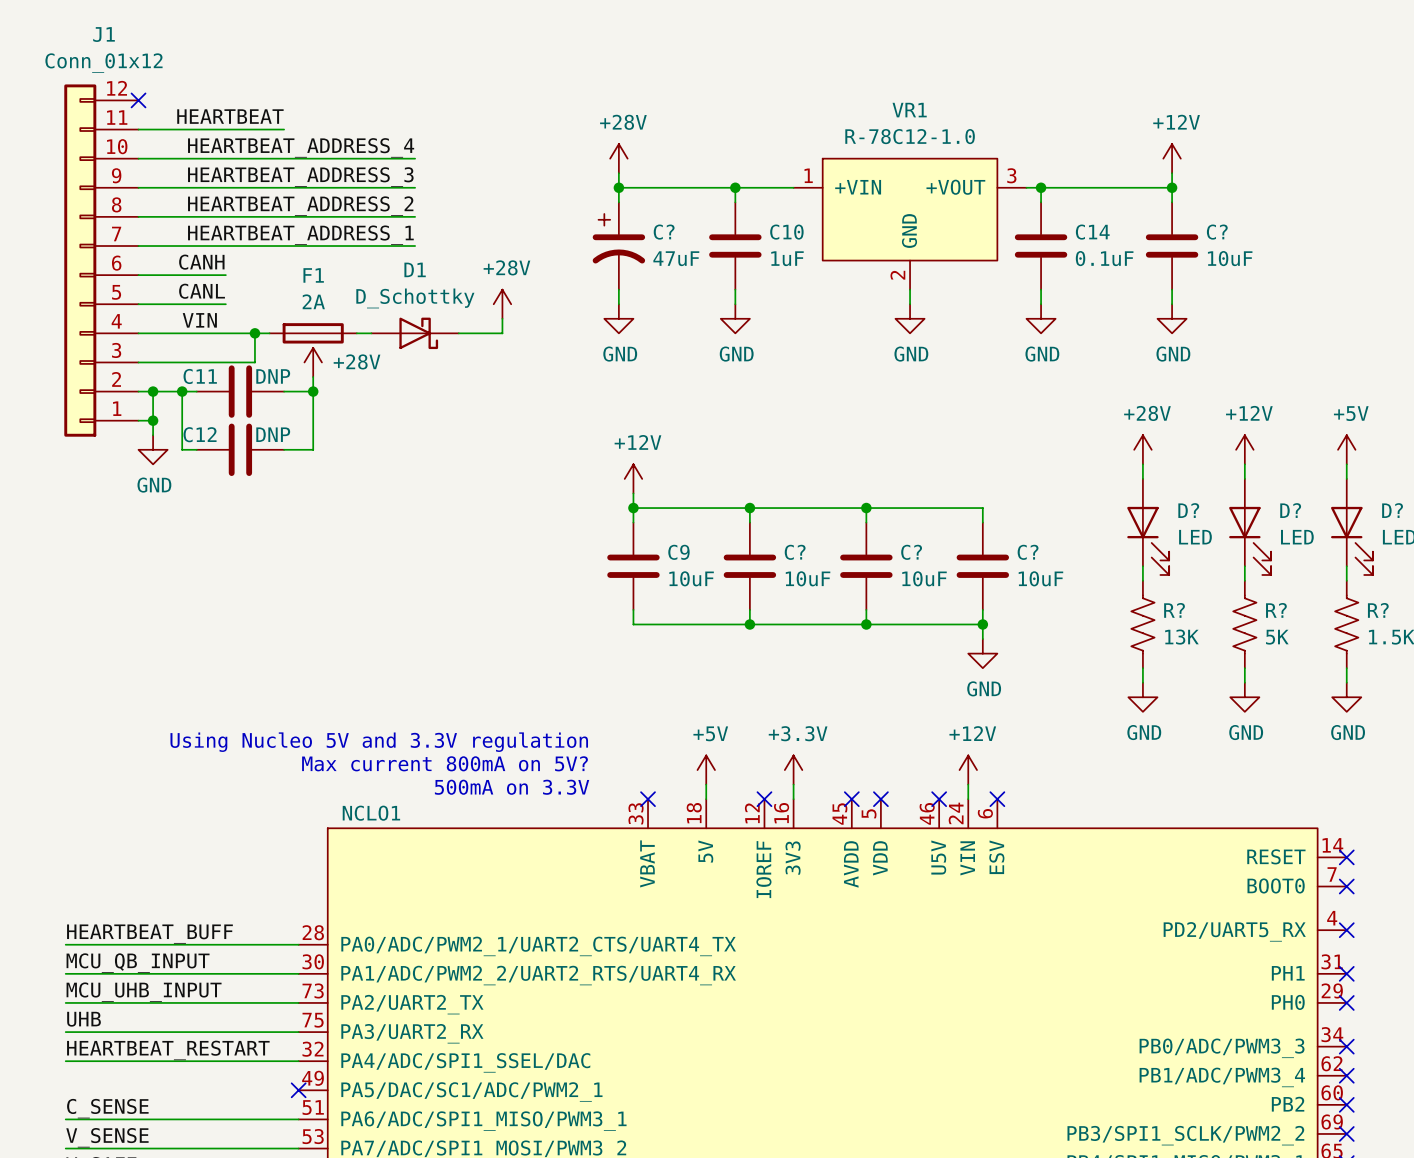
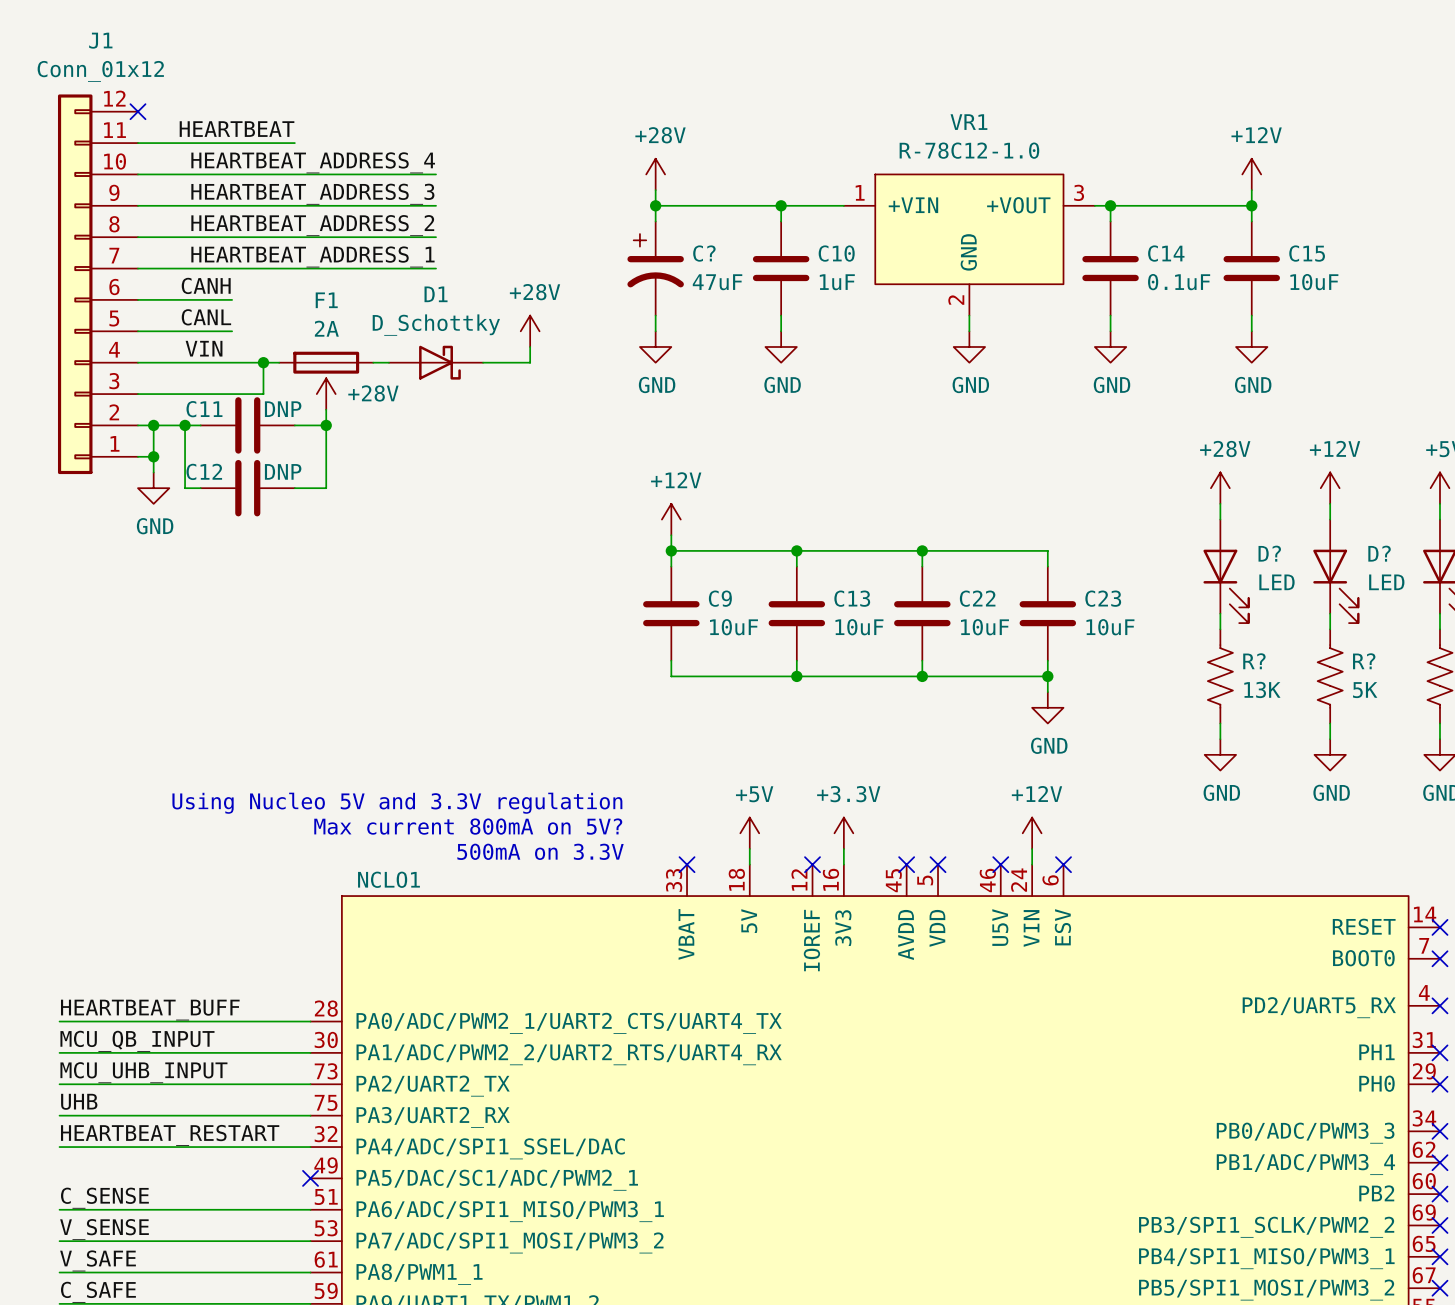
C? name: C? (1217, 232) -> C15 (1307, 253)
C? name: C? (795, 552) -> C13 (852, 598)
C? name: C? (911, 552) -> C22 (977, 598)
C? name: C? (1028, 552) -> C23 (1103, 598)

